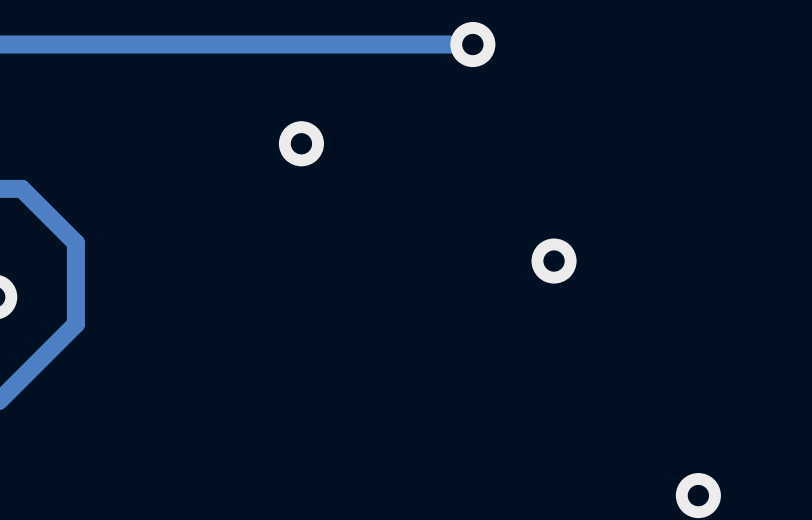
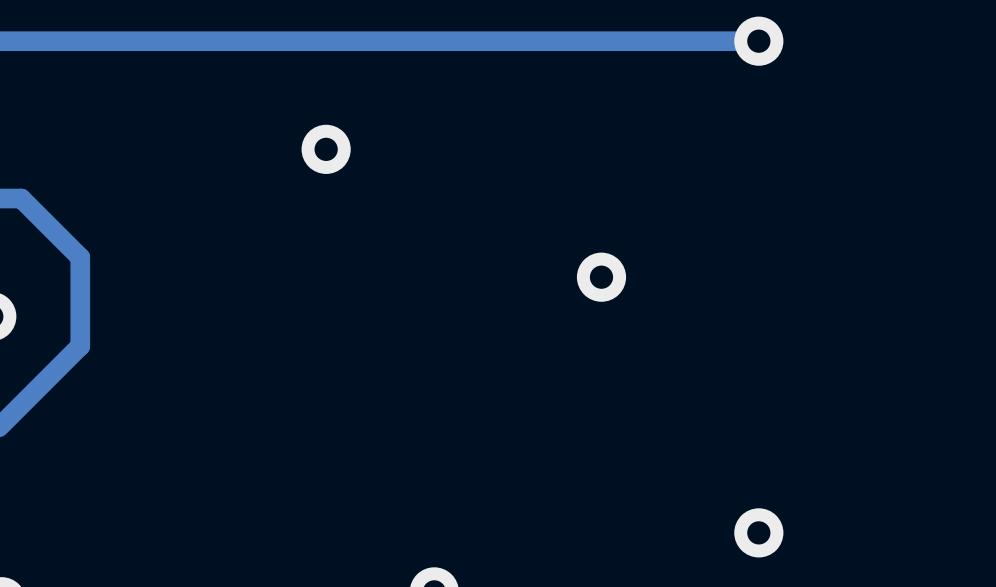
via: (472, 44) -> none
track: none -> (758, 41) (512, 41)
via: none -> (758, 41)

